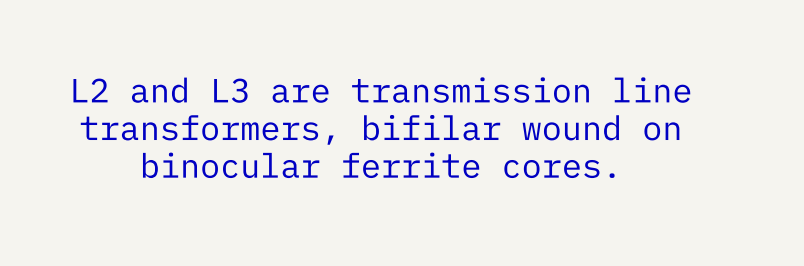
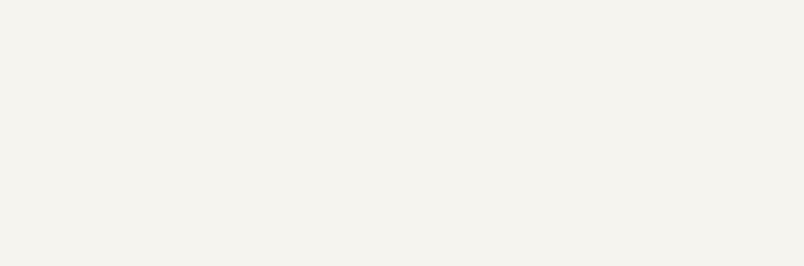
text: L2 and L3 are transmission line (381, 90) -> none
text: transformers, bifilar wound on (380, 129) -> none
text: binocular ferrite cores. (378, 165) -> none

